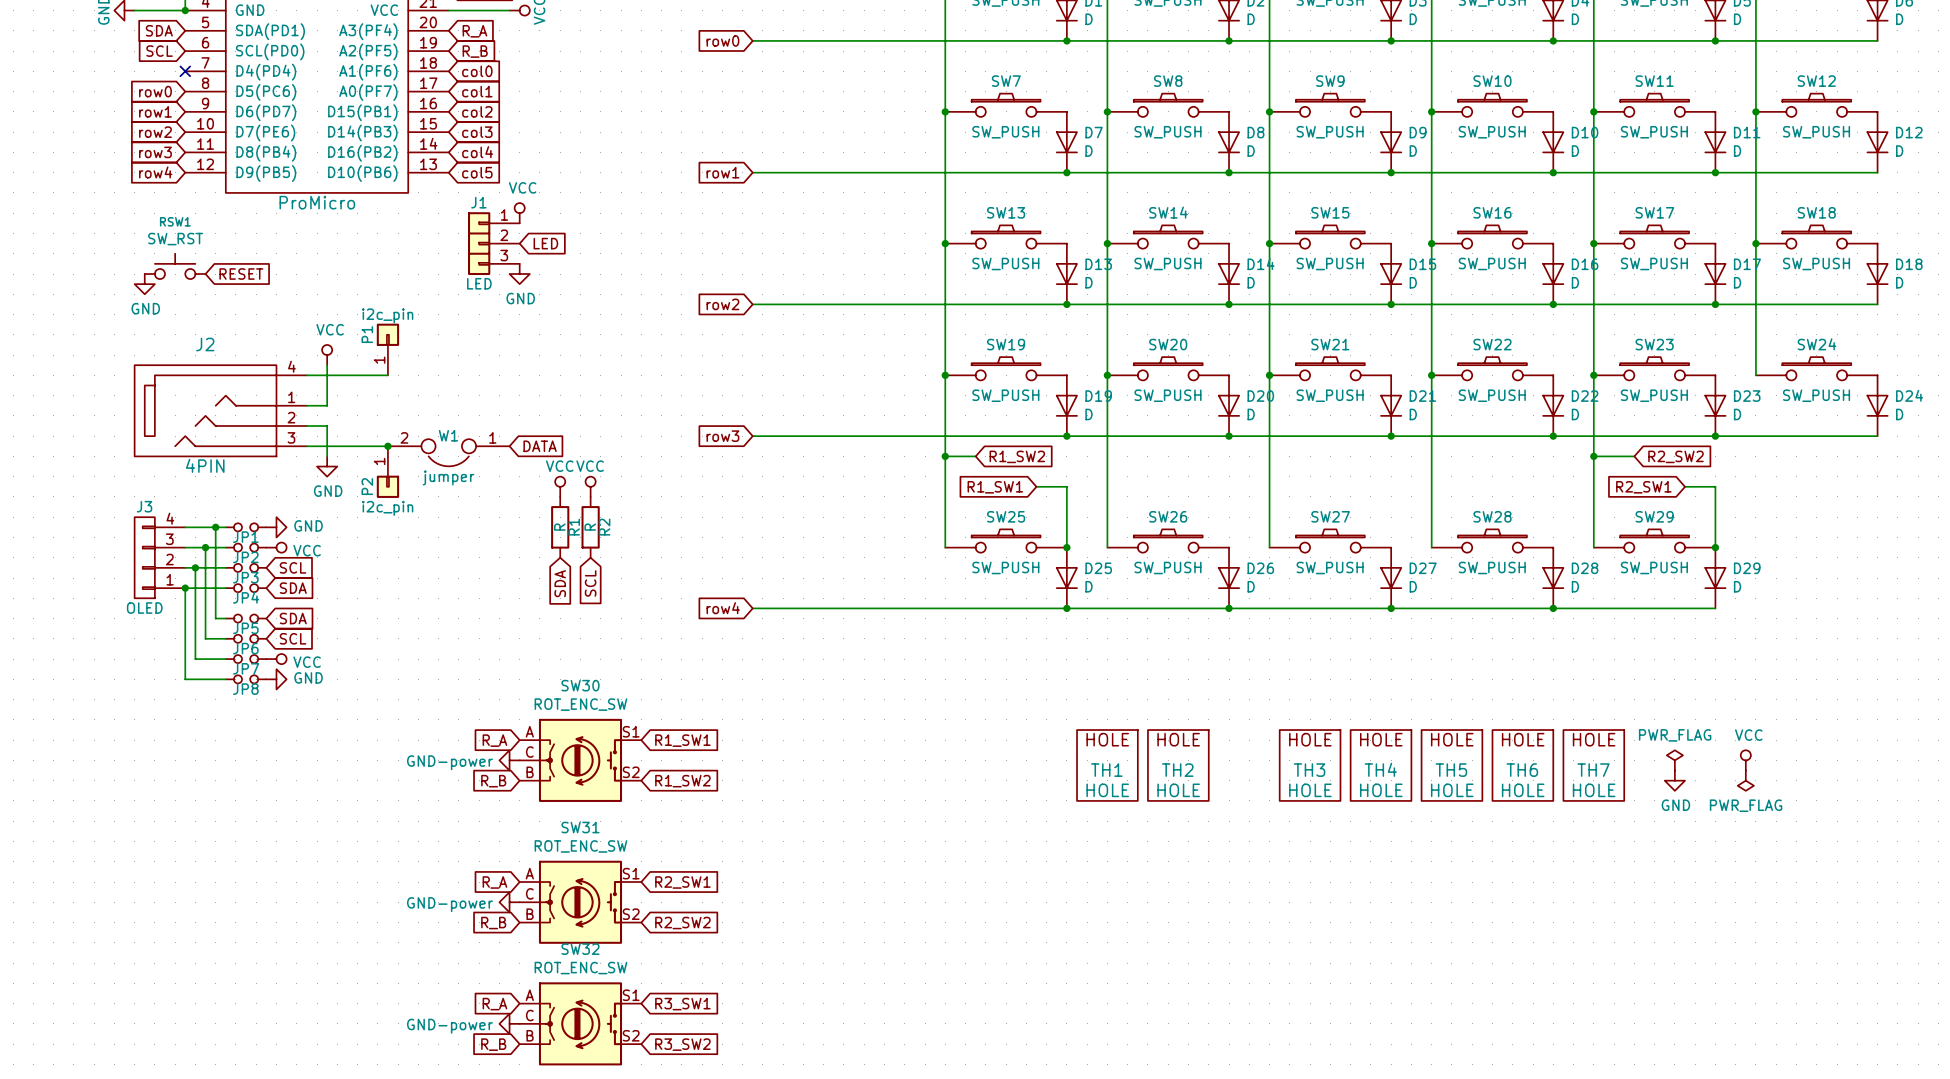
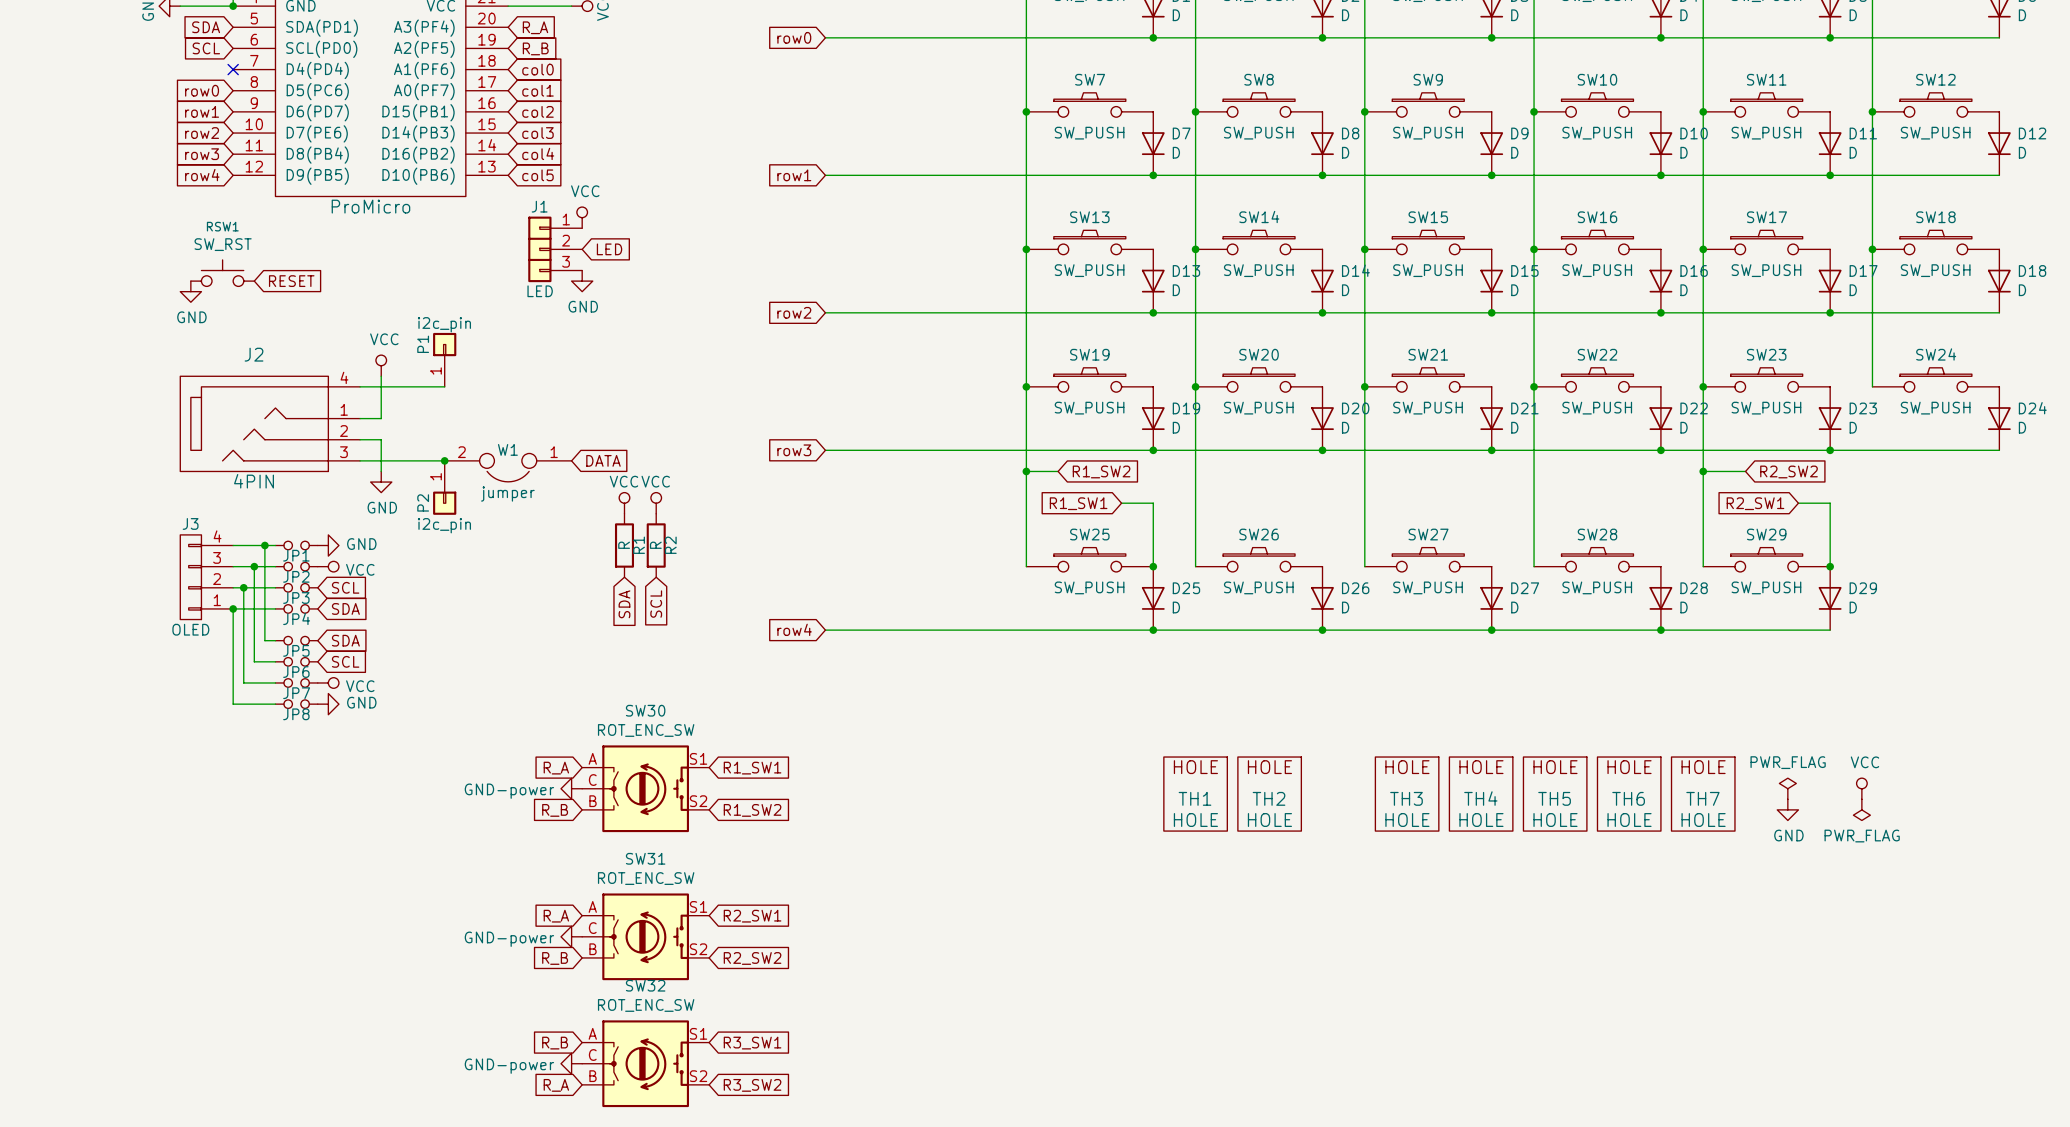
global label: R_A (494, 1004) -> R_B (555, 1043)
global label: R_B (493, 1044) -> R_A (556, 1085)

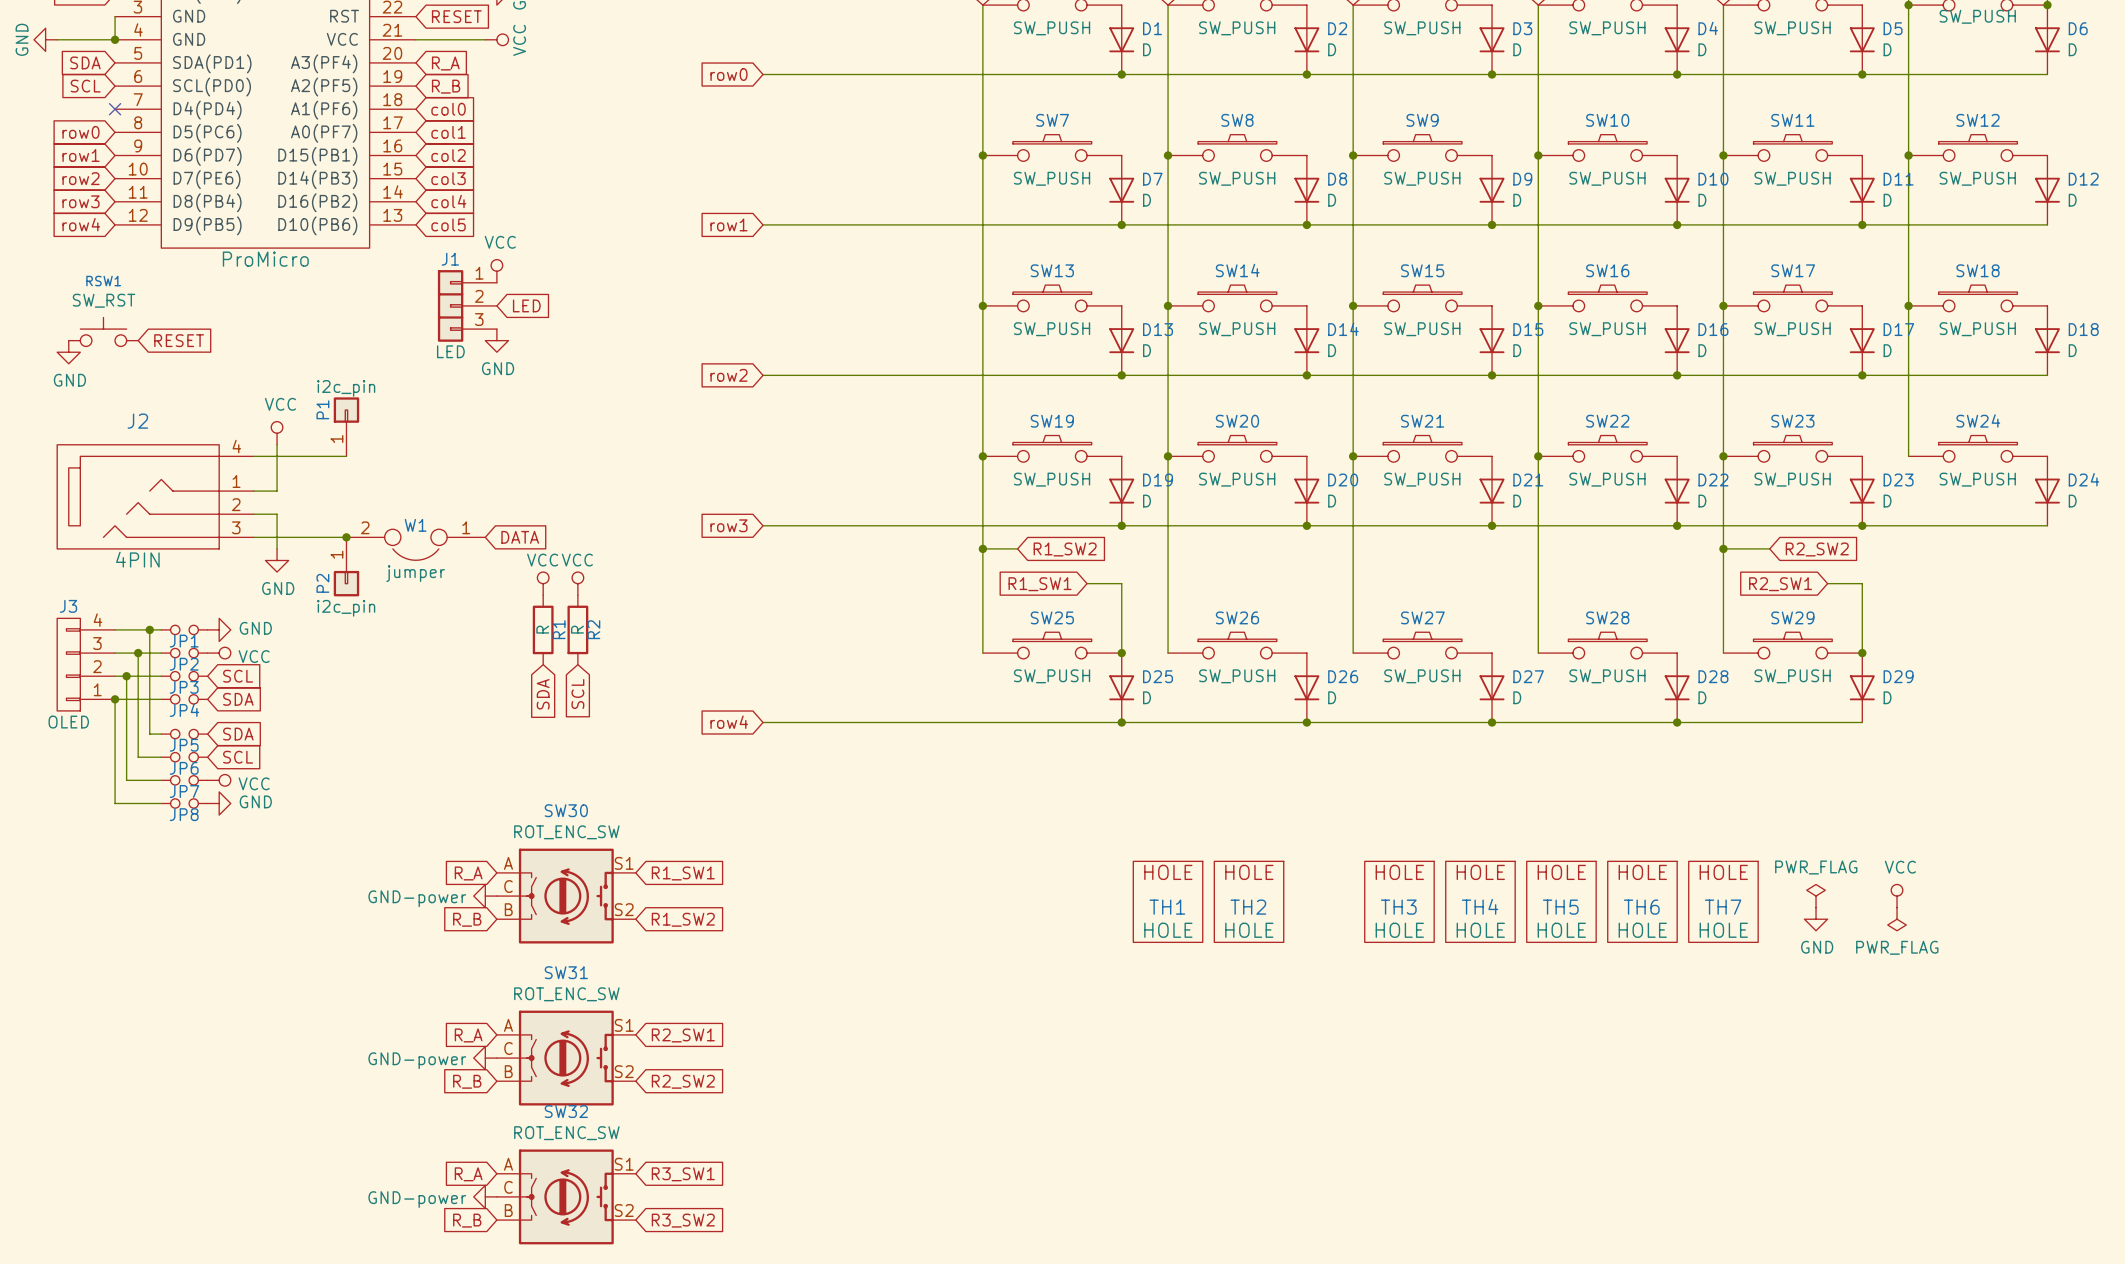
global label: R_B (555, 1043) -> R_A (468, 1174)
global label: R_A (556, 1085) -> R_B (467, 1220)

